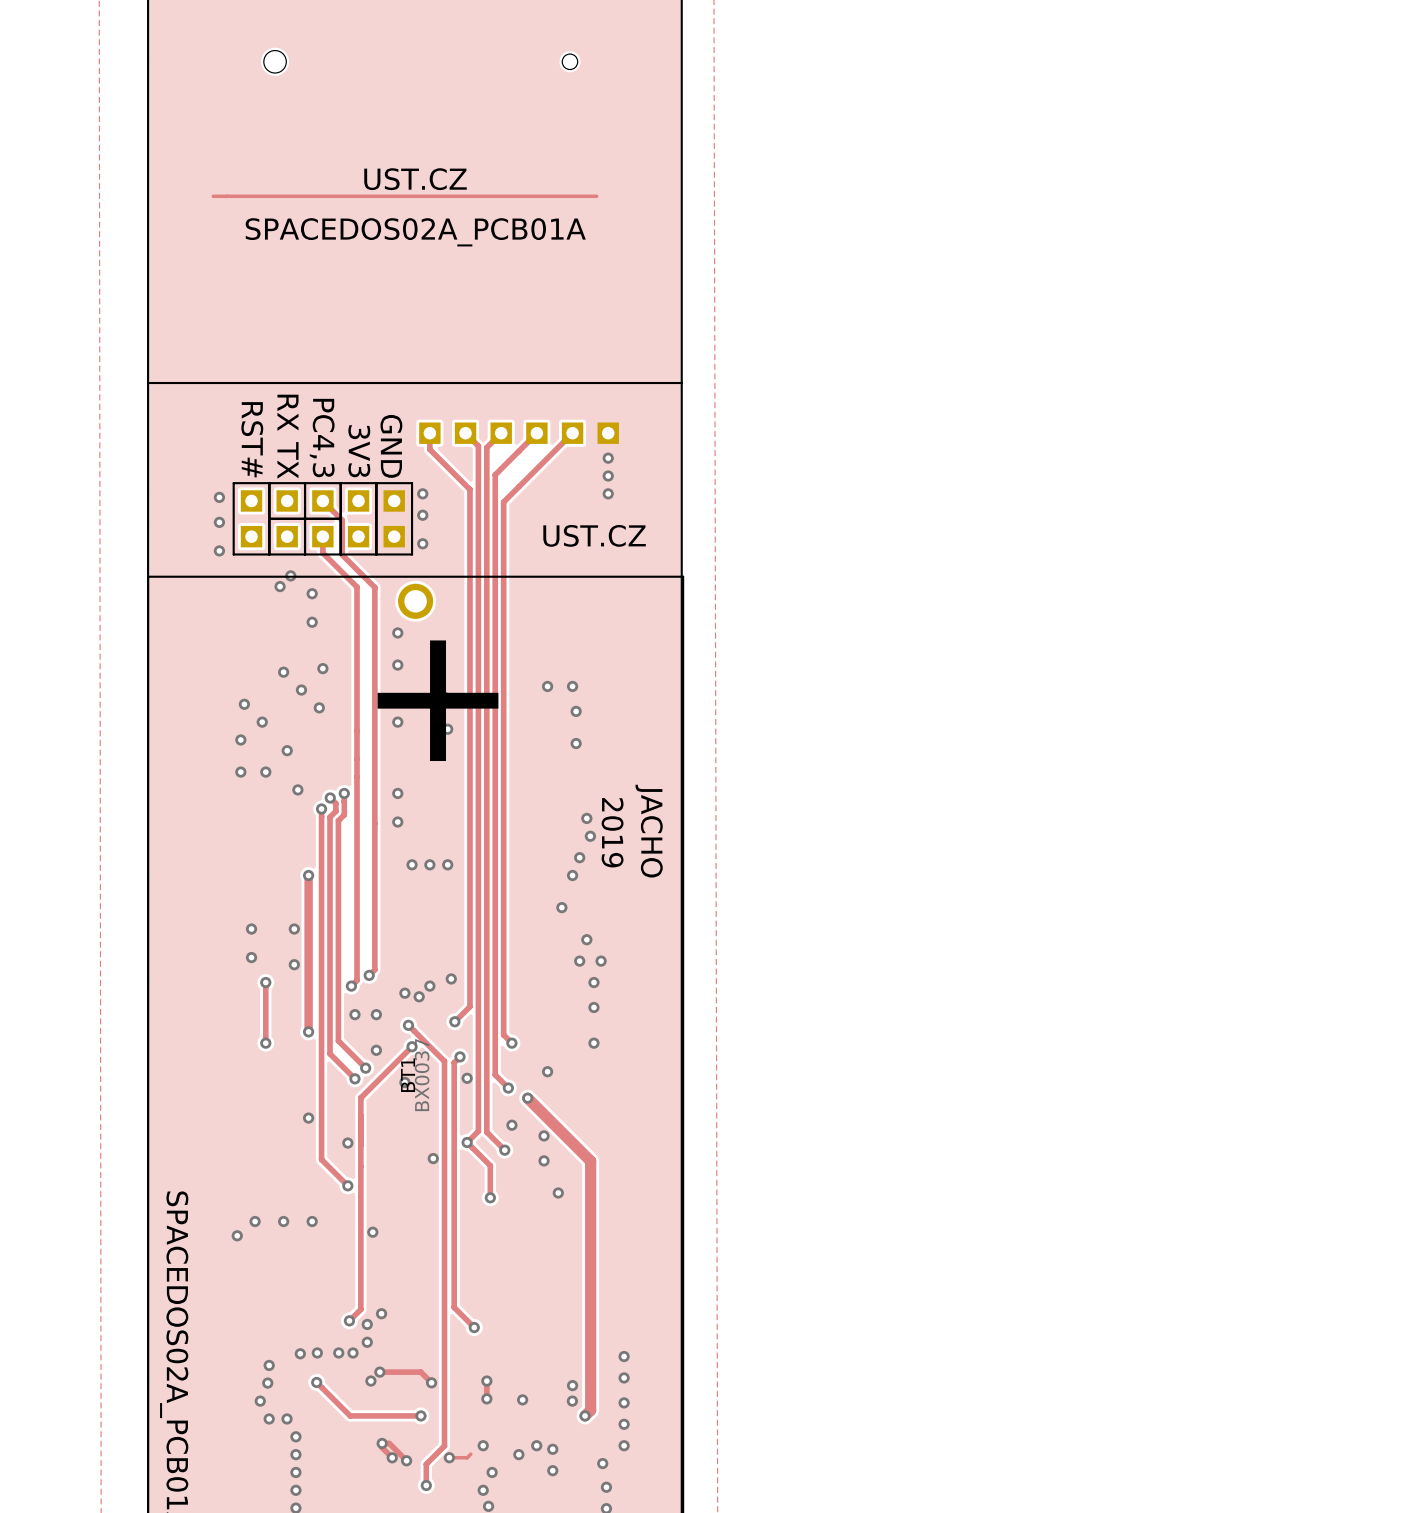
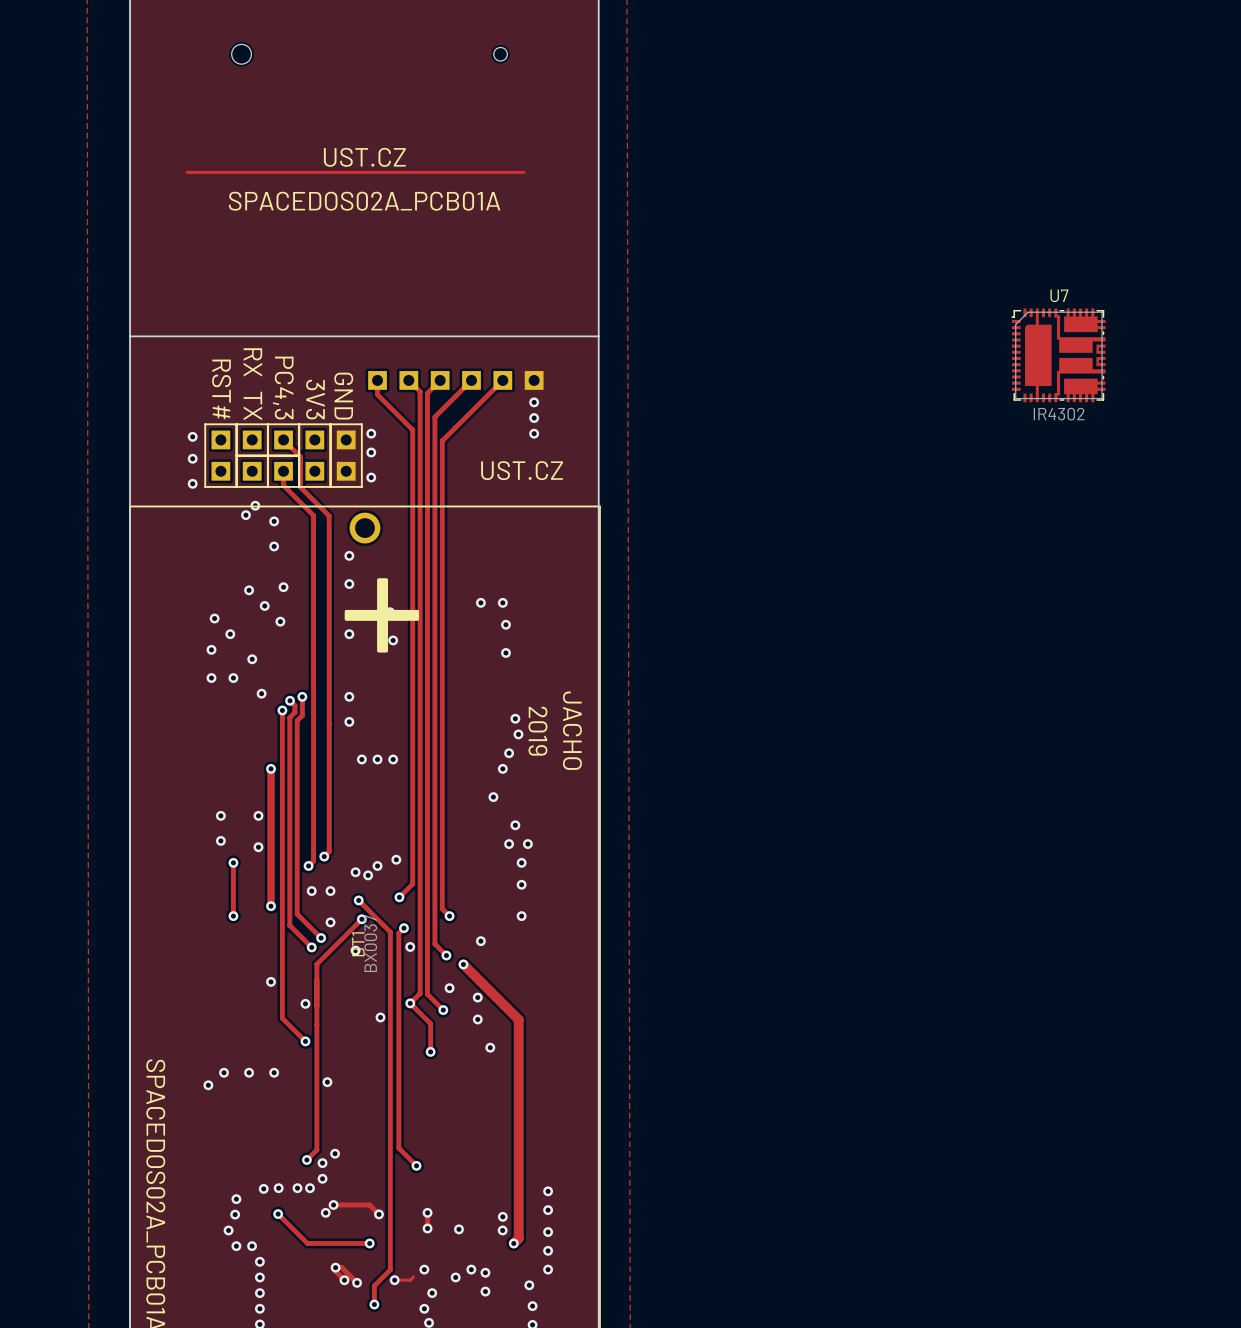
U7: none -> IR4302 (1058, 355)

